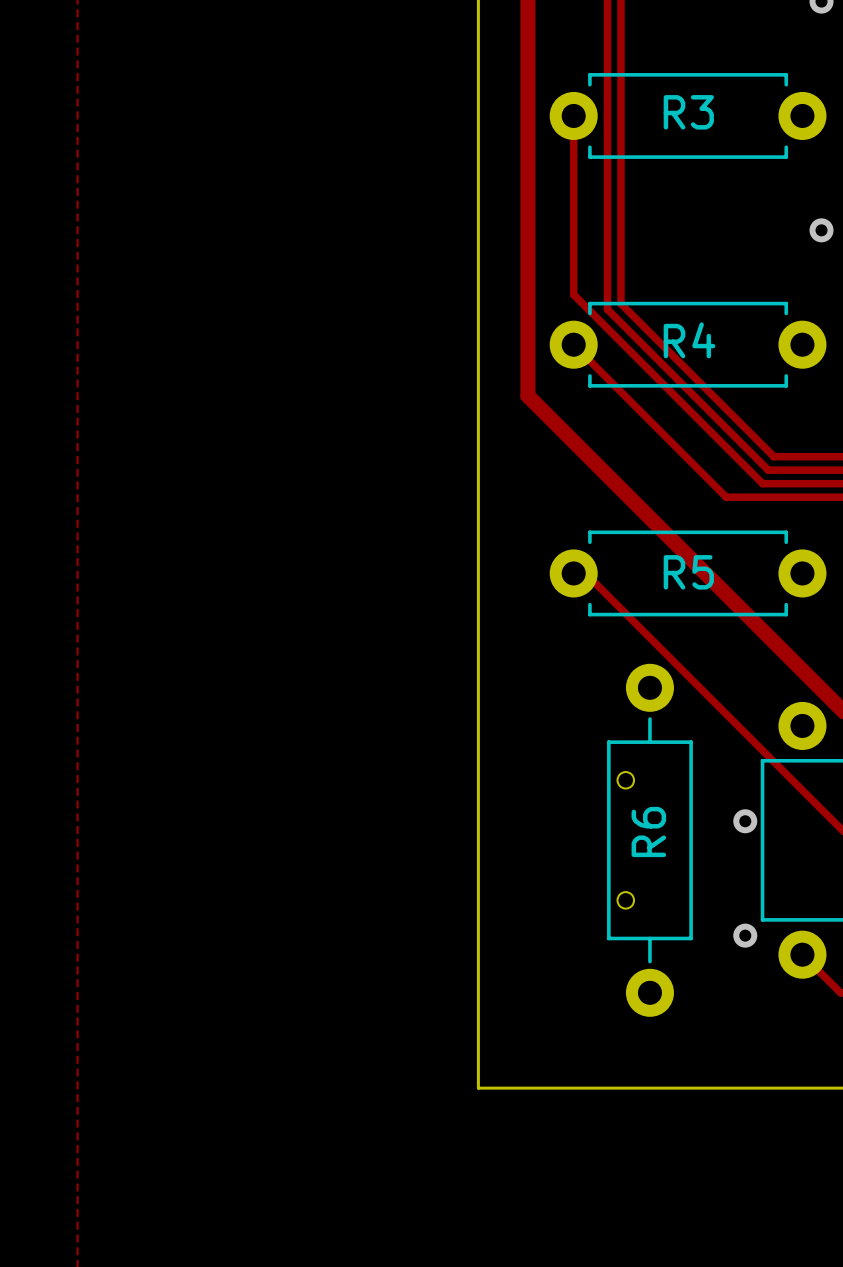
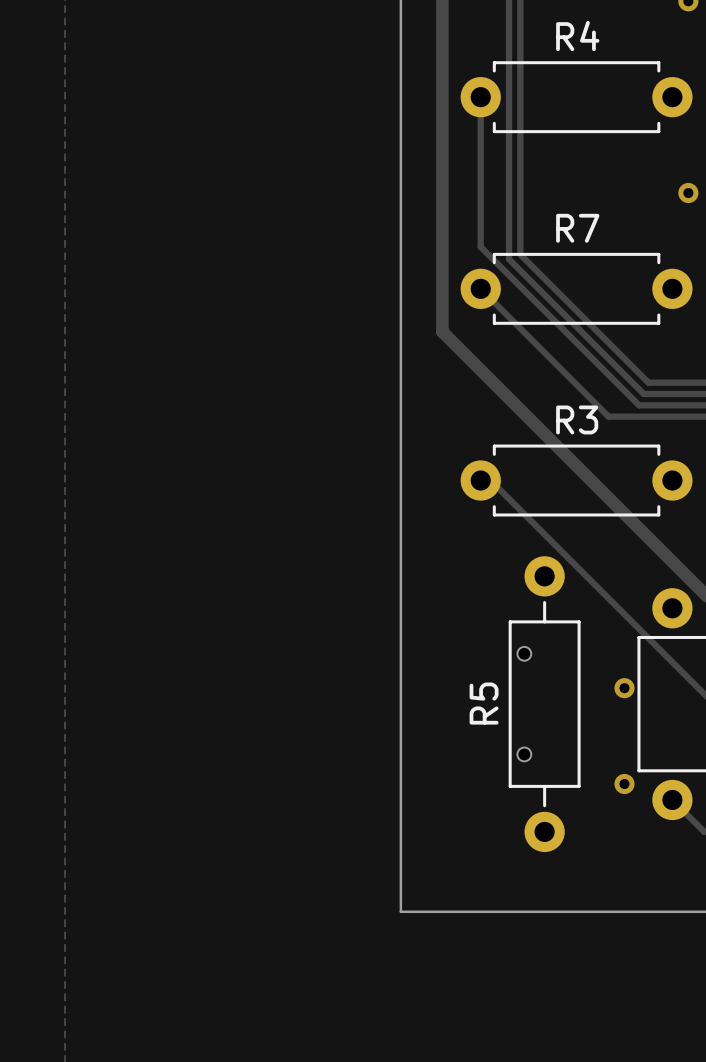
R3 name: R3 (688, 112) -> R4 (577, 36)
R4 name: R4 (689, 340) -> R7 (577, 228)
R5 name: R5 (688, 572) -> R3 (577, 419)
R6 name: R6 (648, 831) -> R5 (484, 703)

